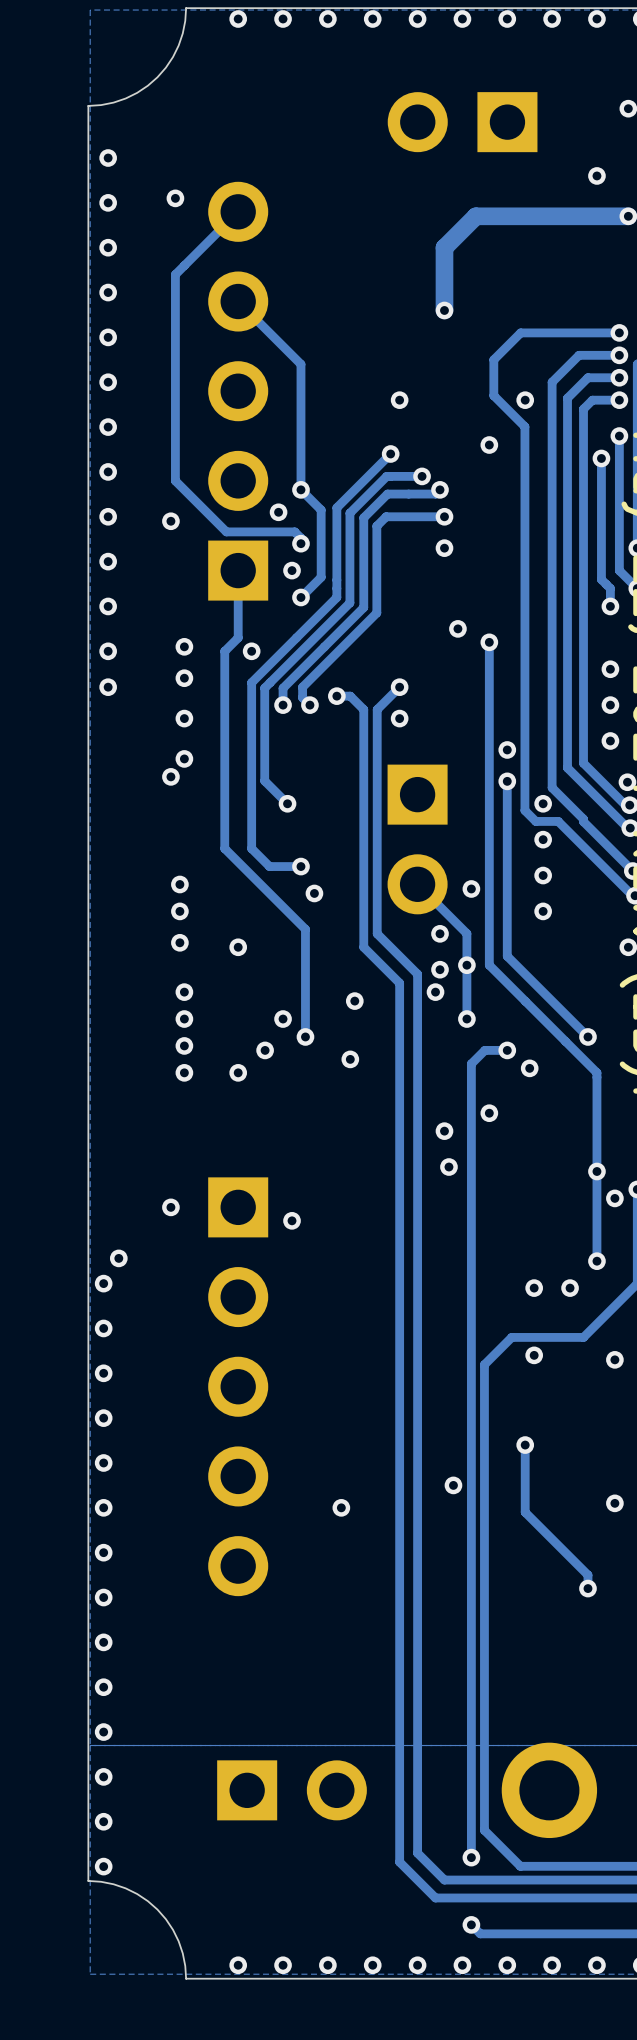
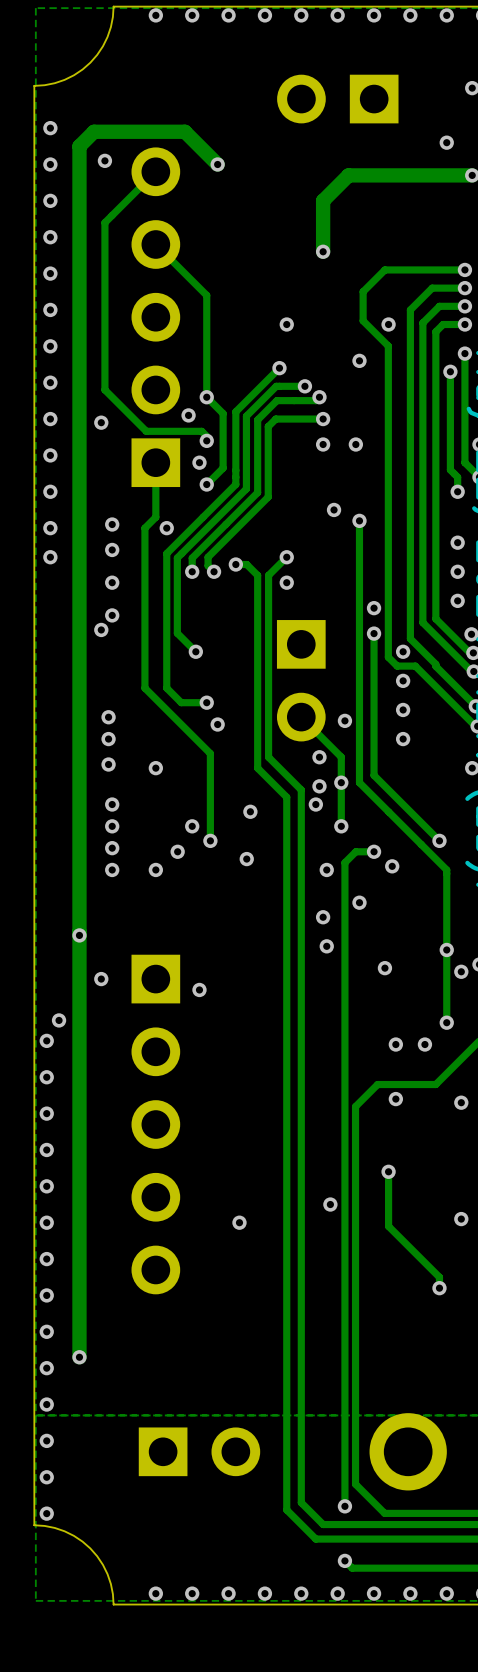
track: none -> (217, 164) (184, 131) (94, 131) (79, 146) (79, 1357)
via: none -> (217, 164)
via: none -> (355, 444)
via: none -> (326, 869)
via: none -> (79, 935)
via: none -> (384, 968)
via: none -> (79, 1357)

